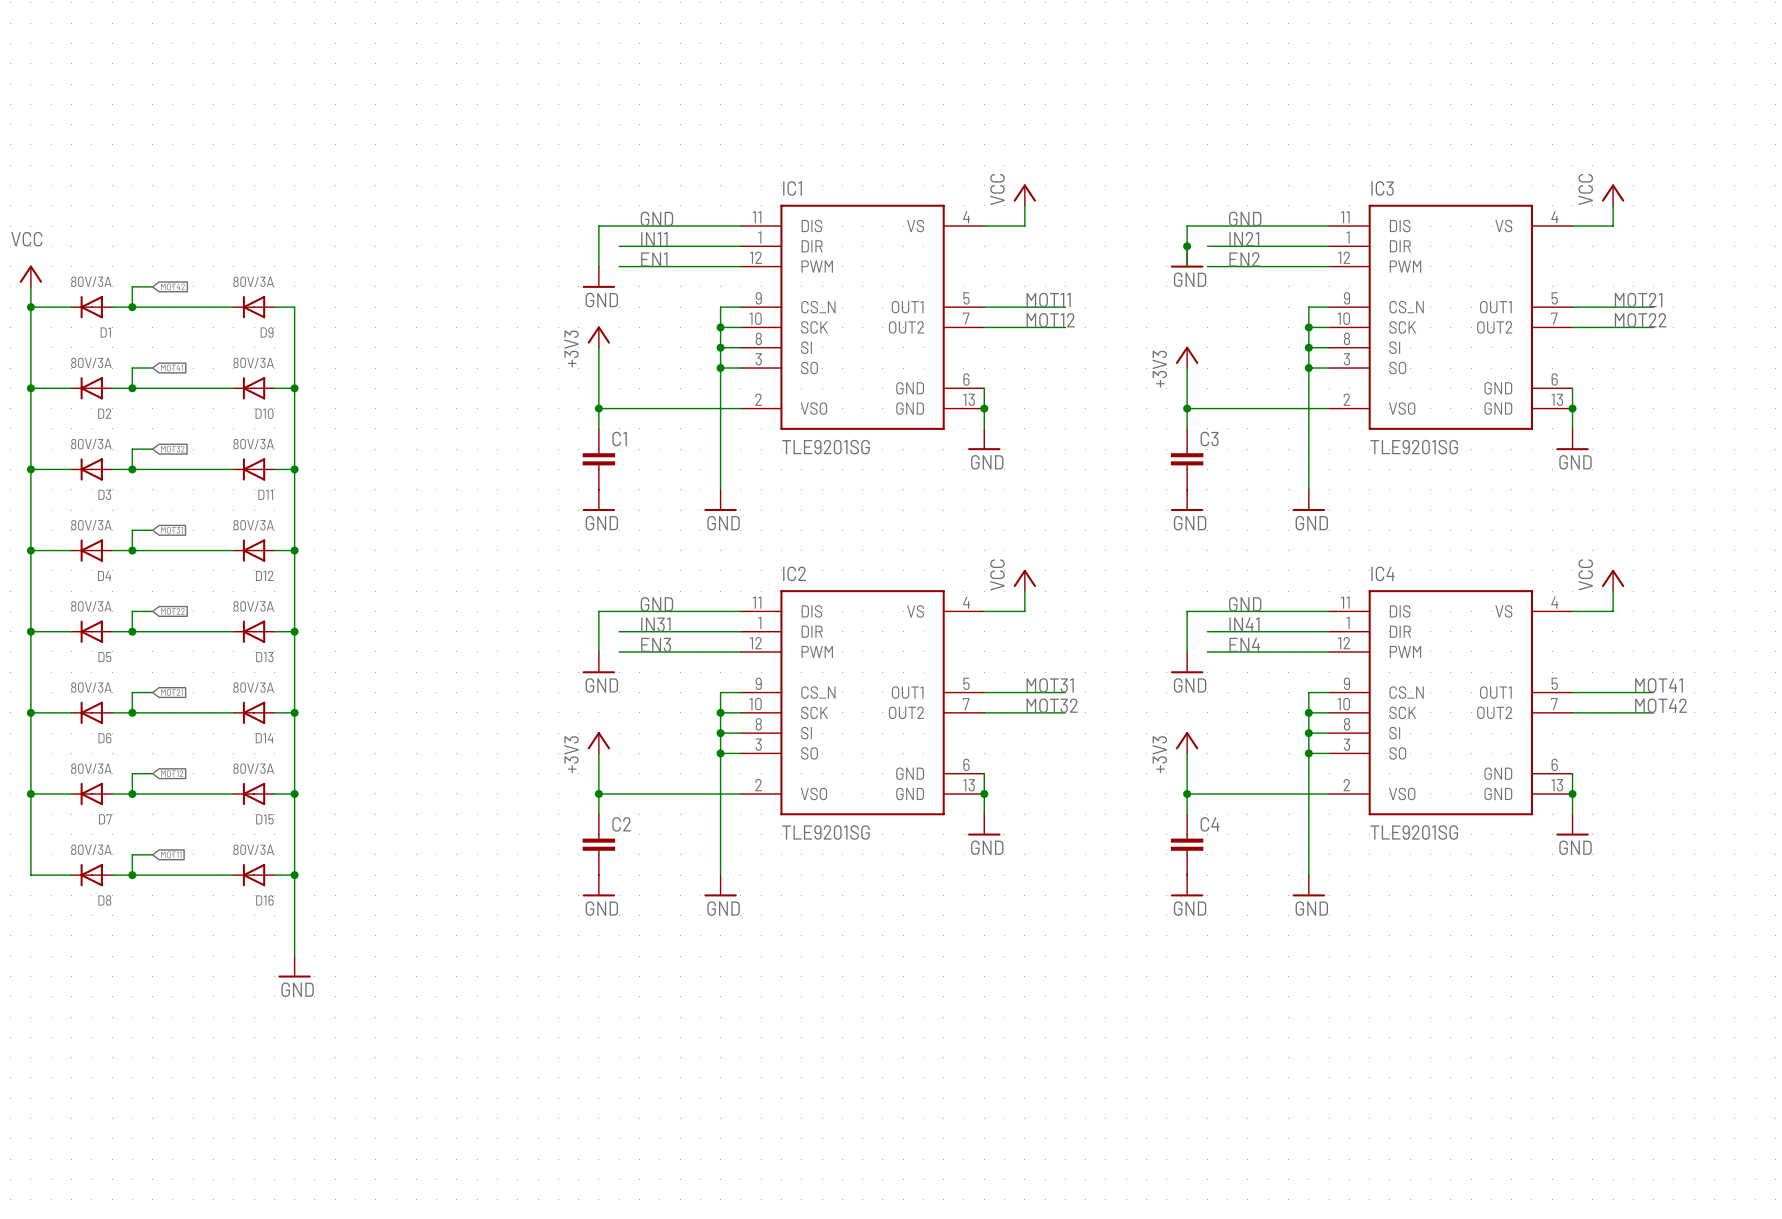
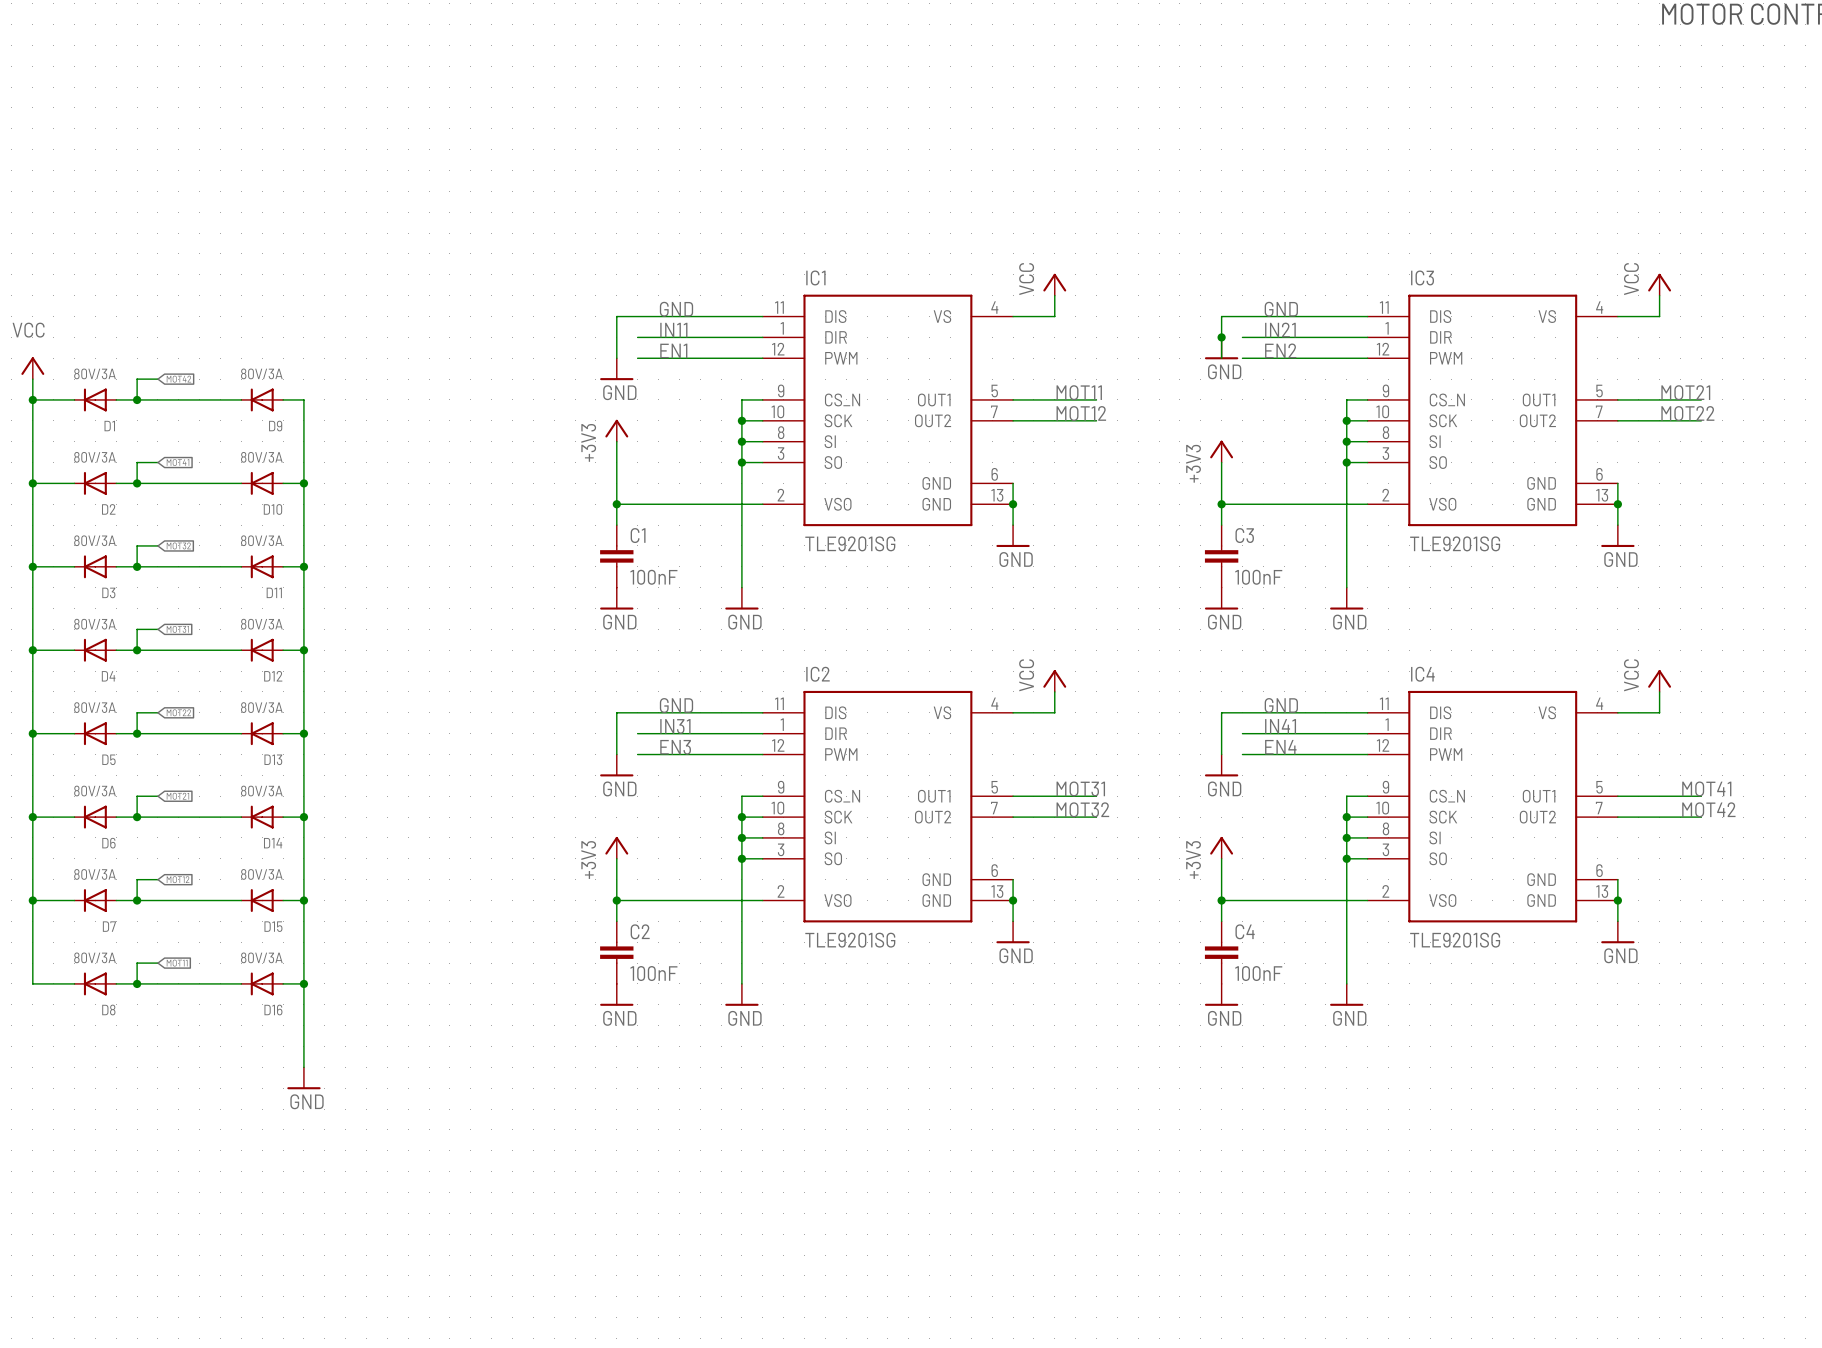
C1 value: none -> 100nF (653, 577)
C3 value: none -> 100nF (1258, 577)
C2 value: none -> 100nF (653, 973)
C4 value: none -> 100nF (1258, 973)

